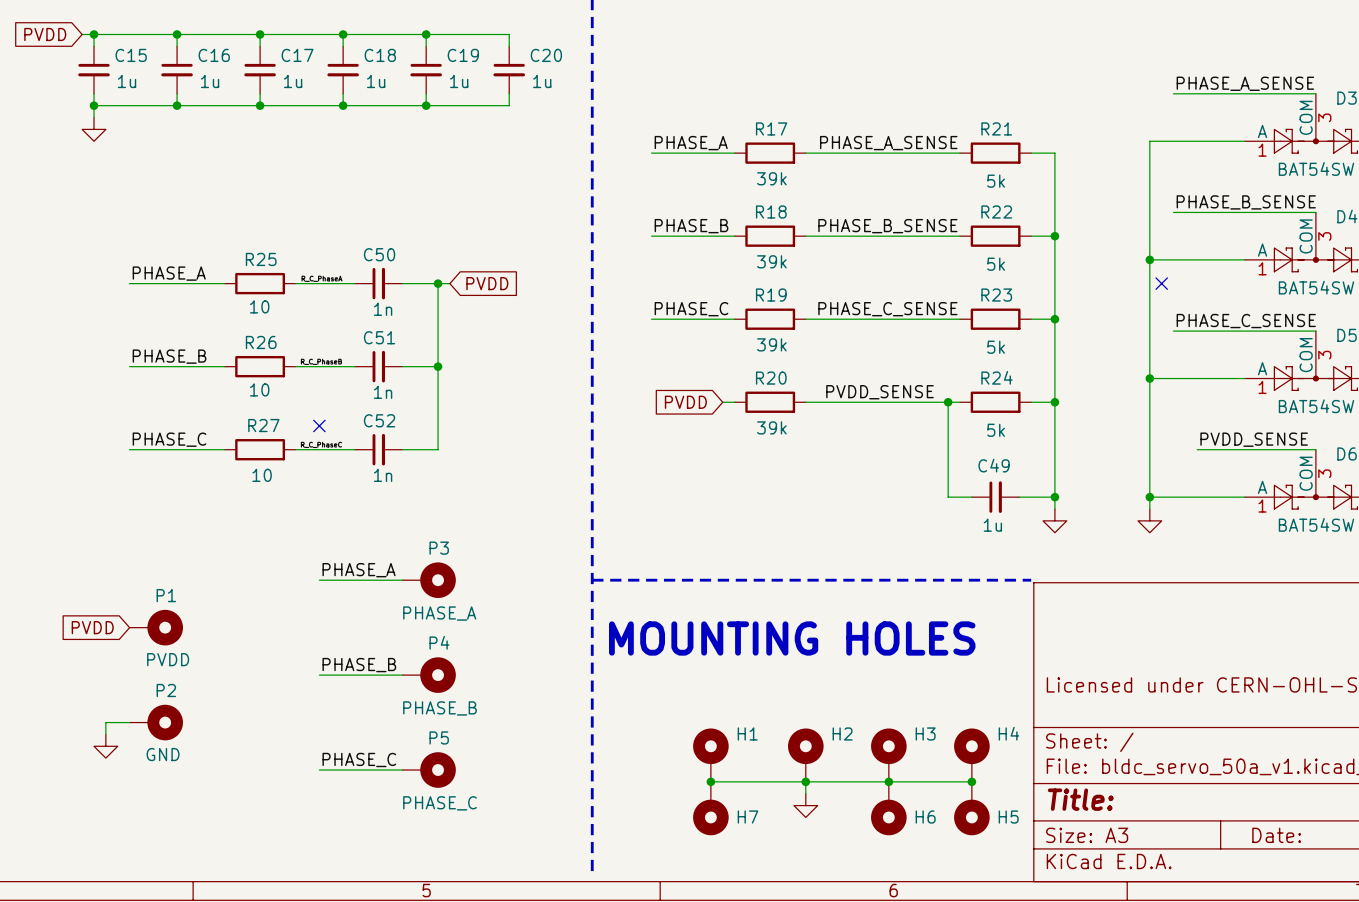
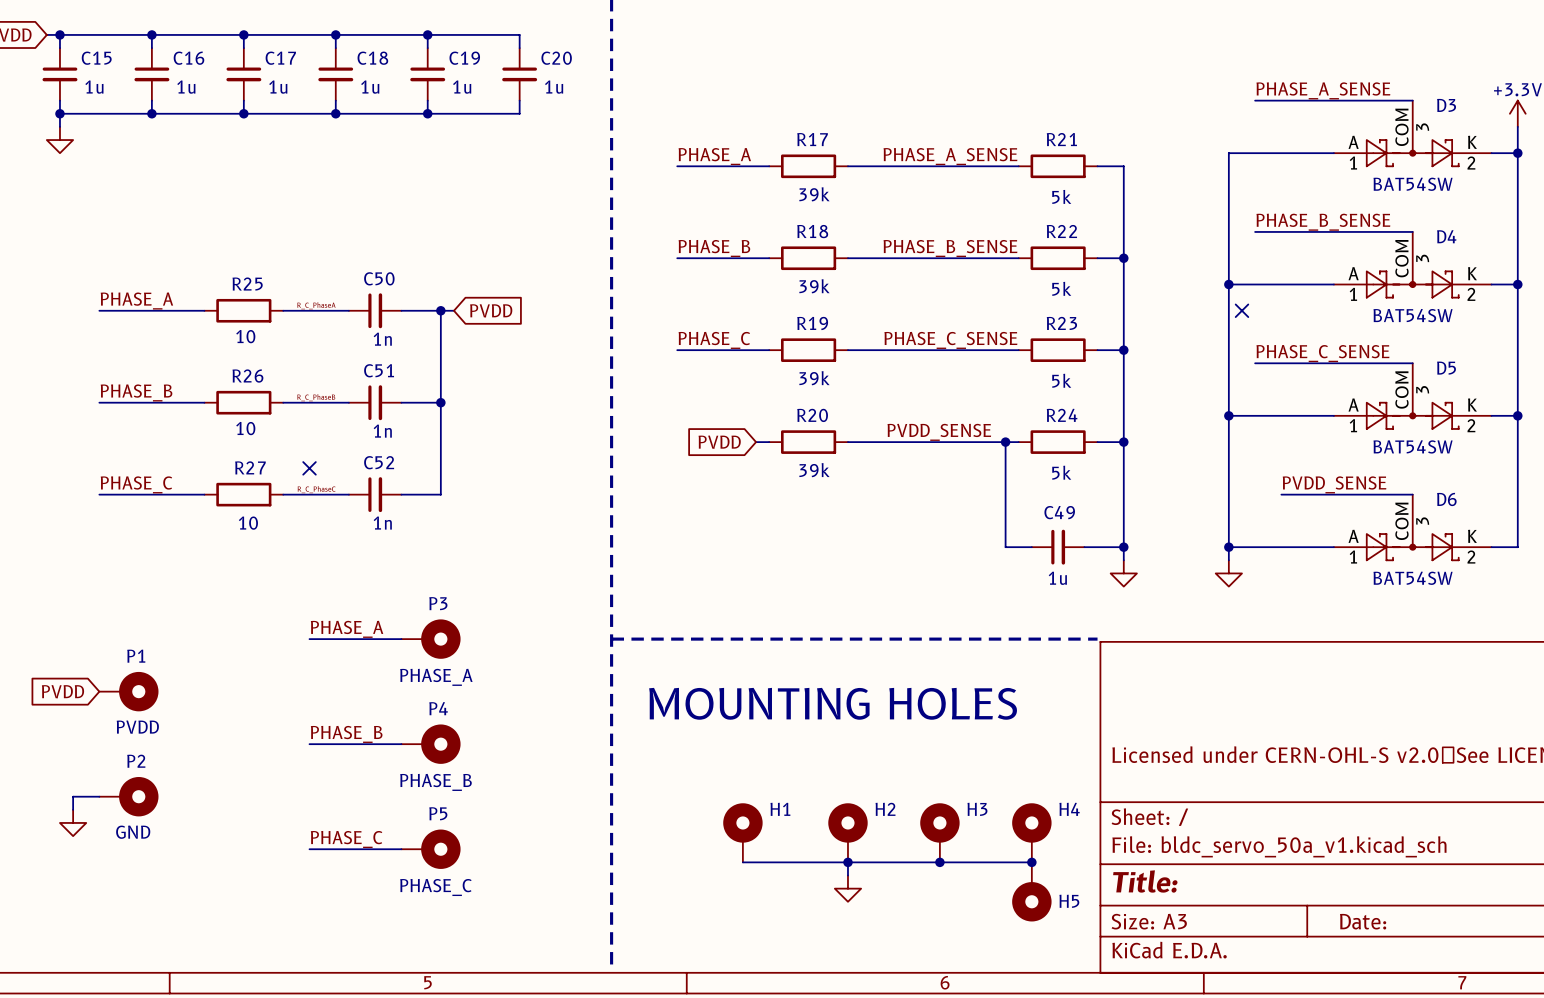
junction: (710, 781) -> none
H7: (710, 808) -> none
H6: (888, 808) -> none

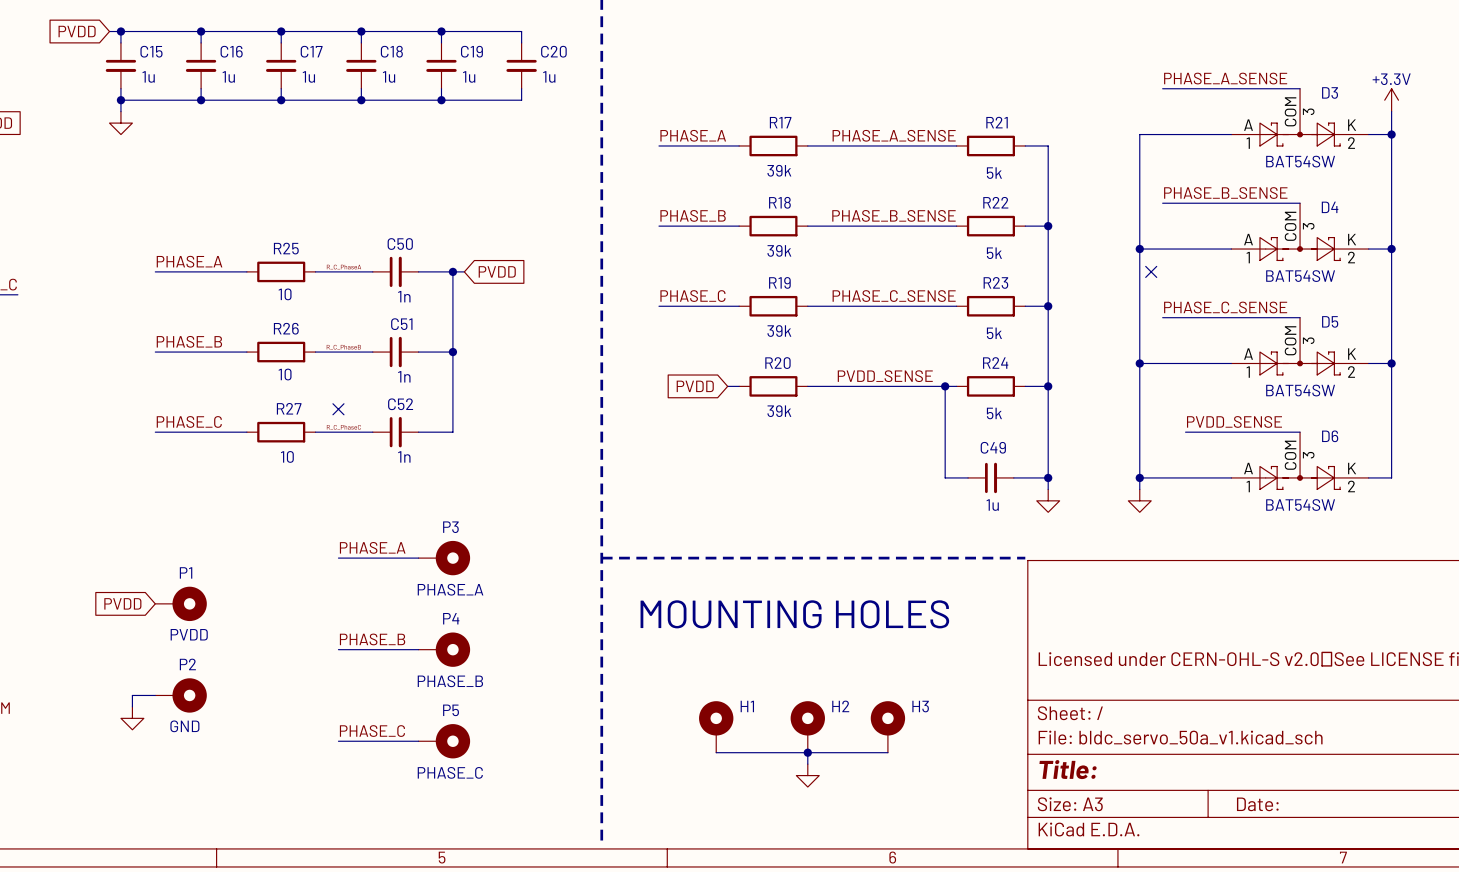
H4: (1031, 832) -> none
wire: (939, 862) (1031, 862) -> none
junction: (939, 862) -> none
junction: (1031, 862) -> none
H5: (1031, 891) -> none

